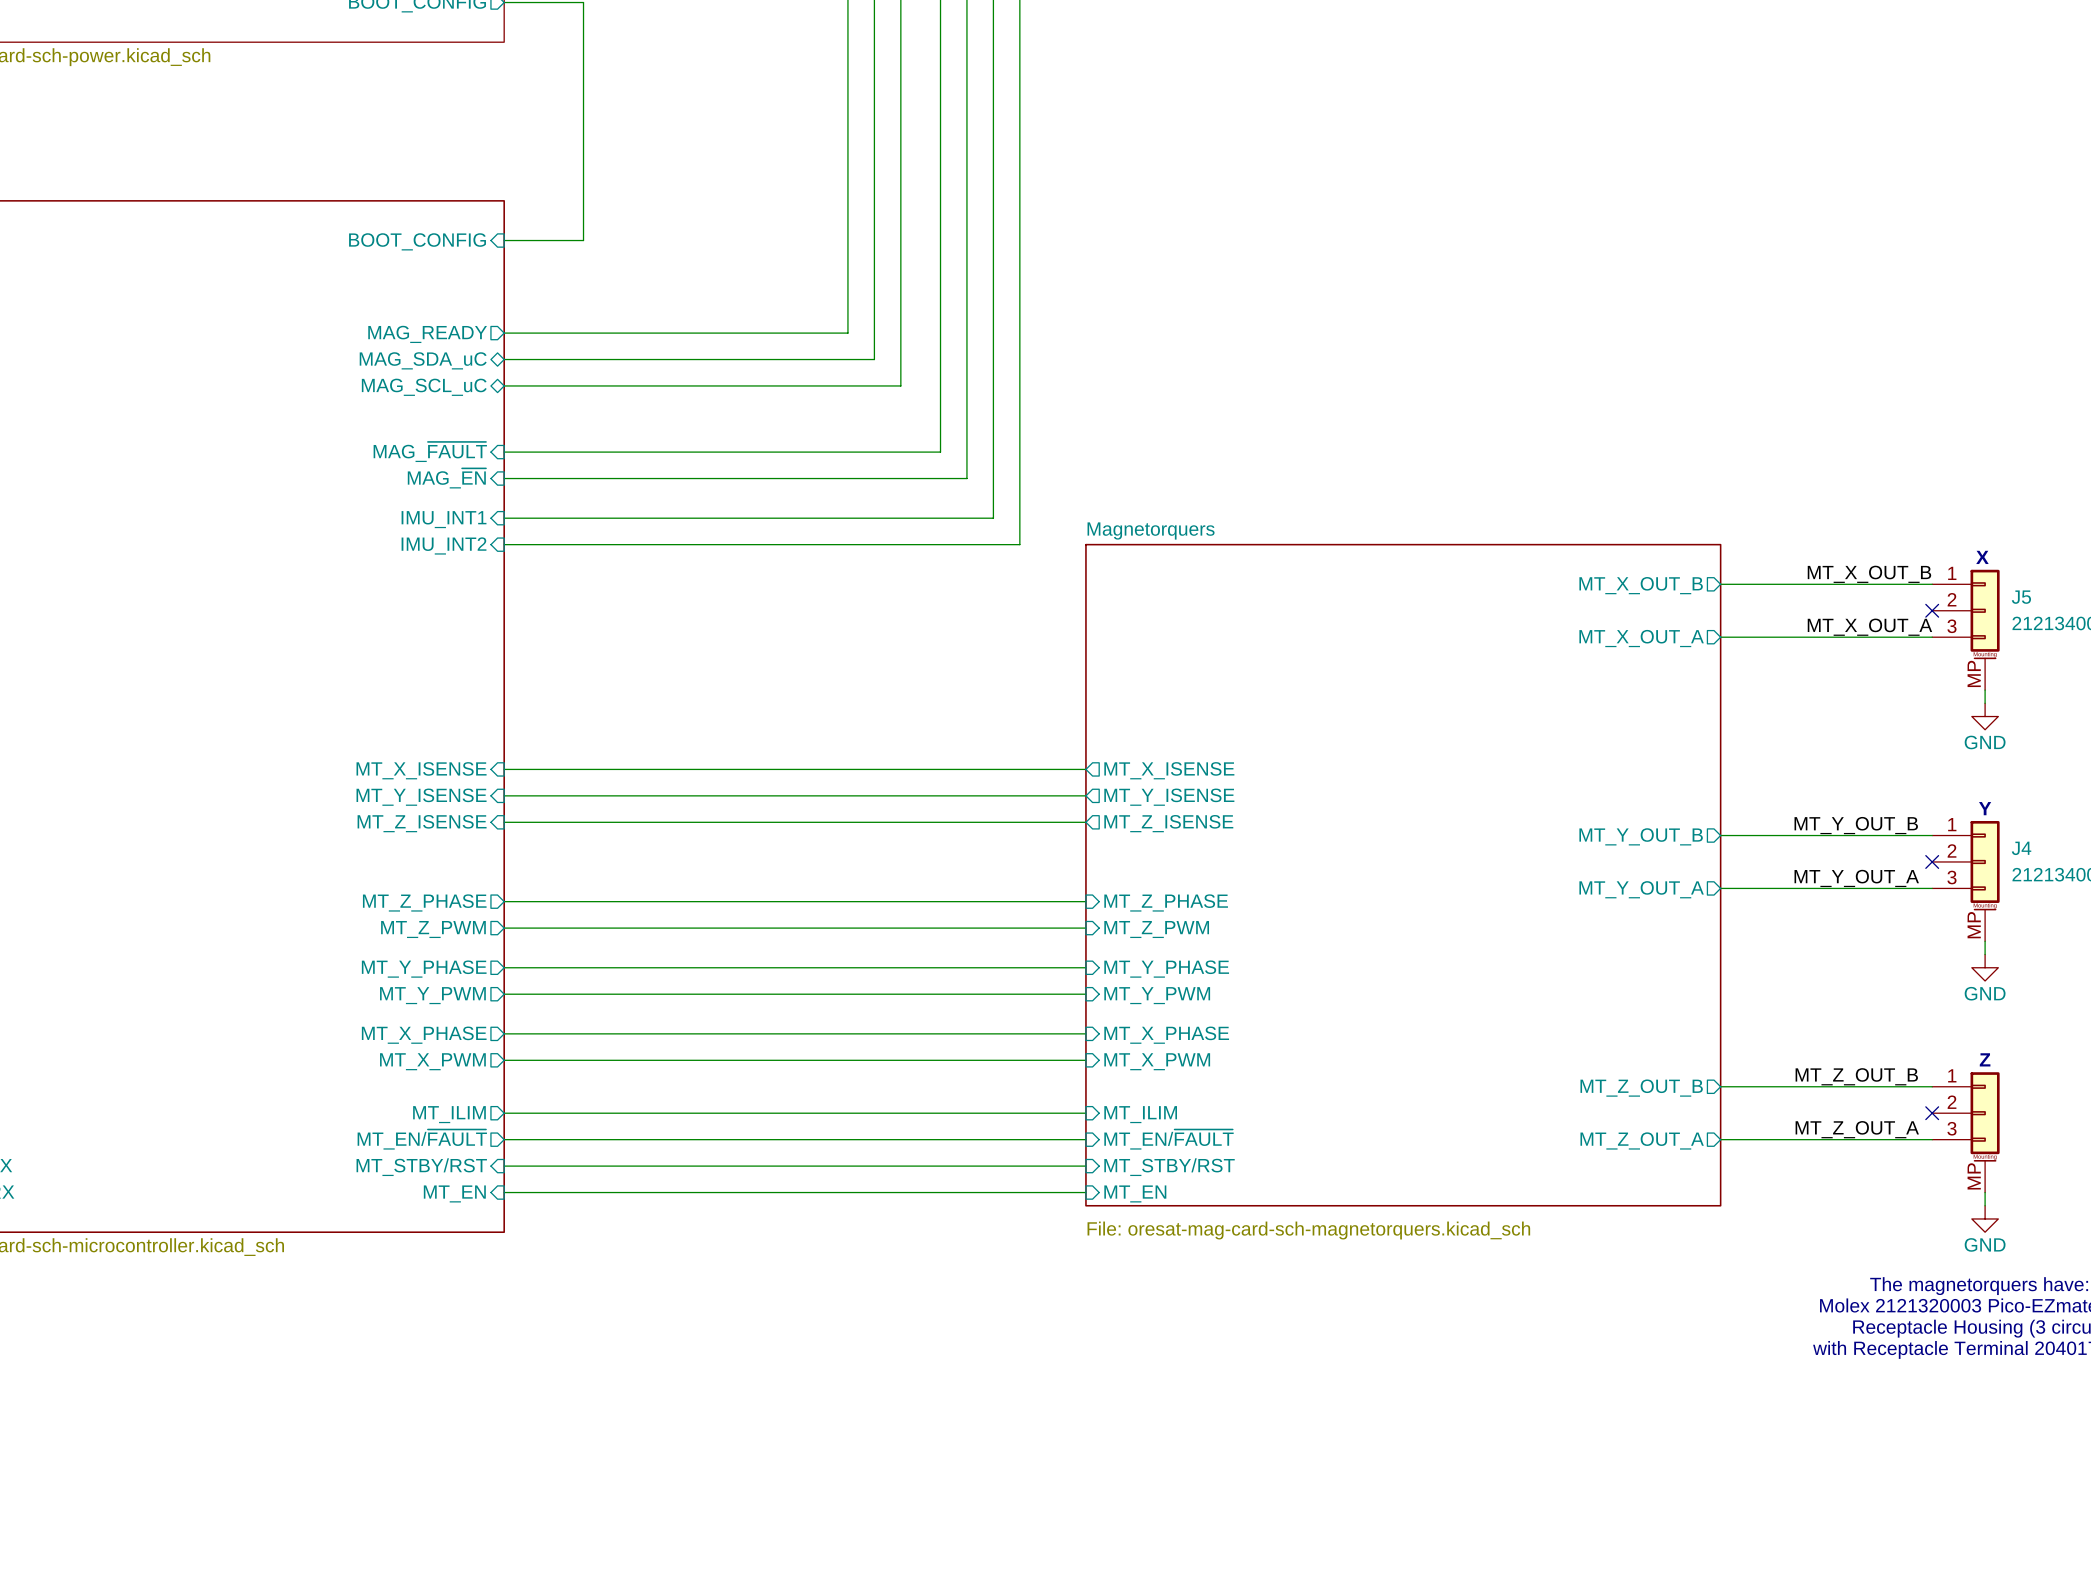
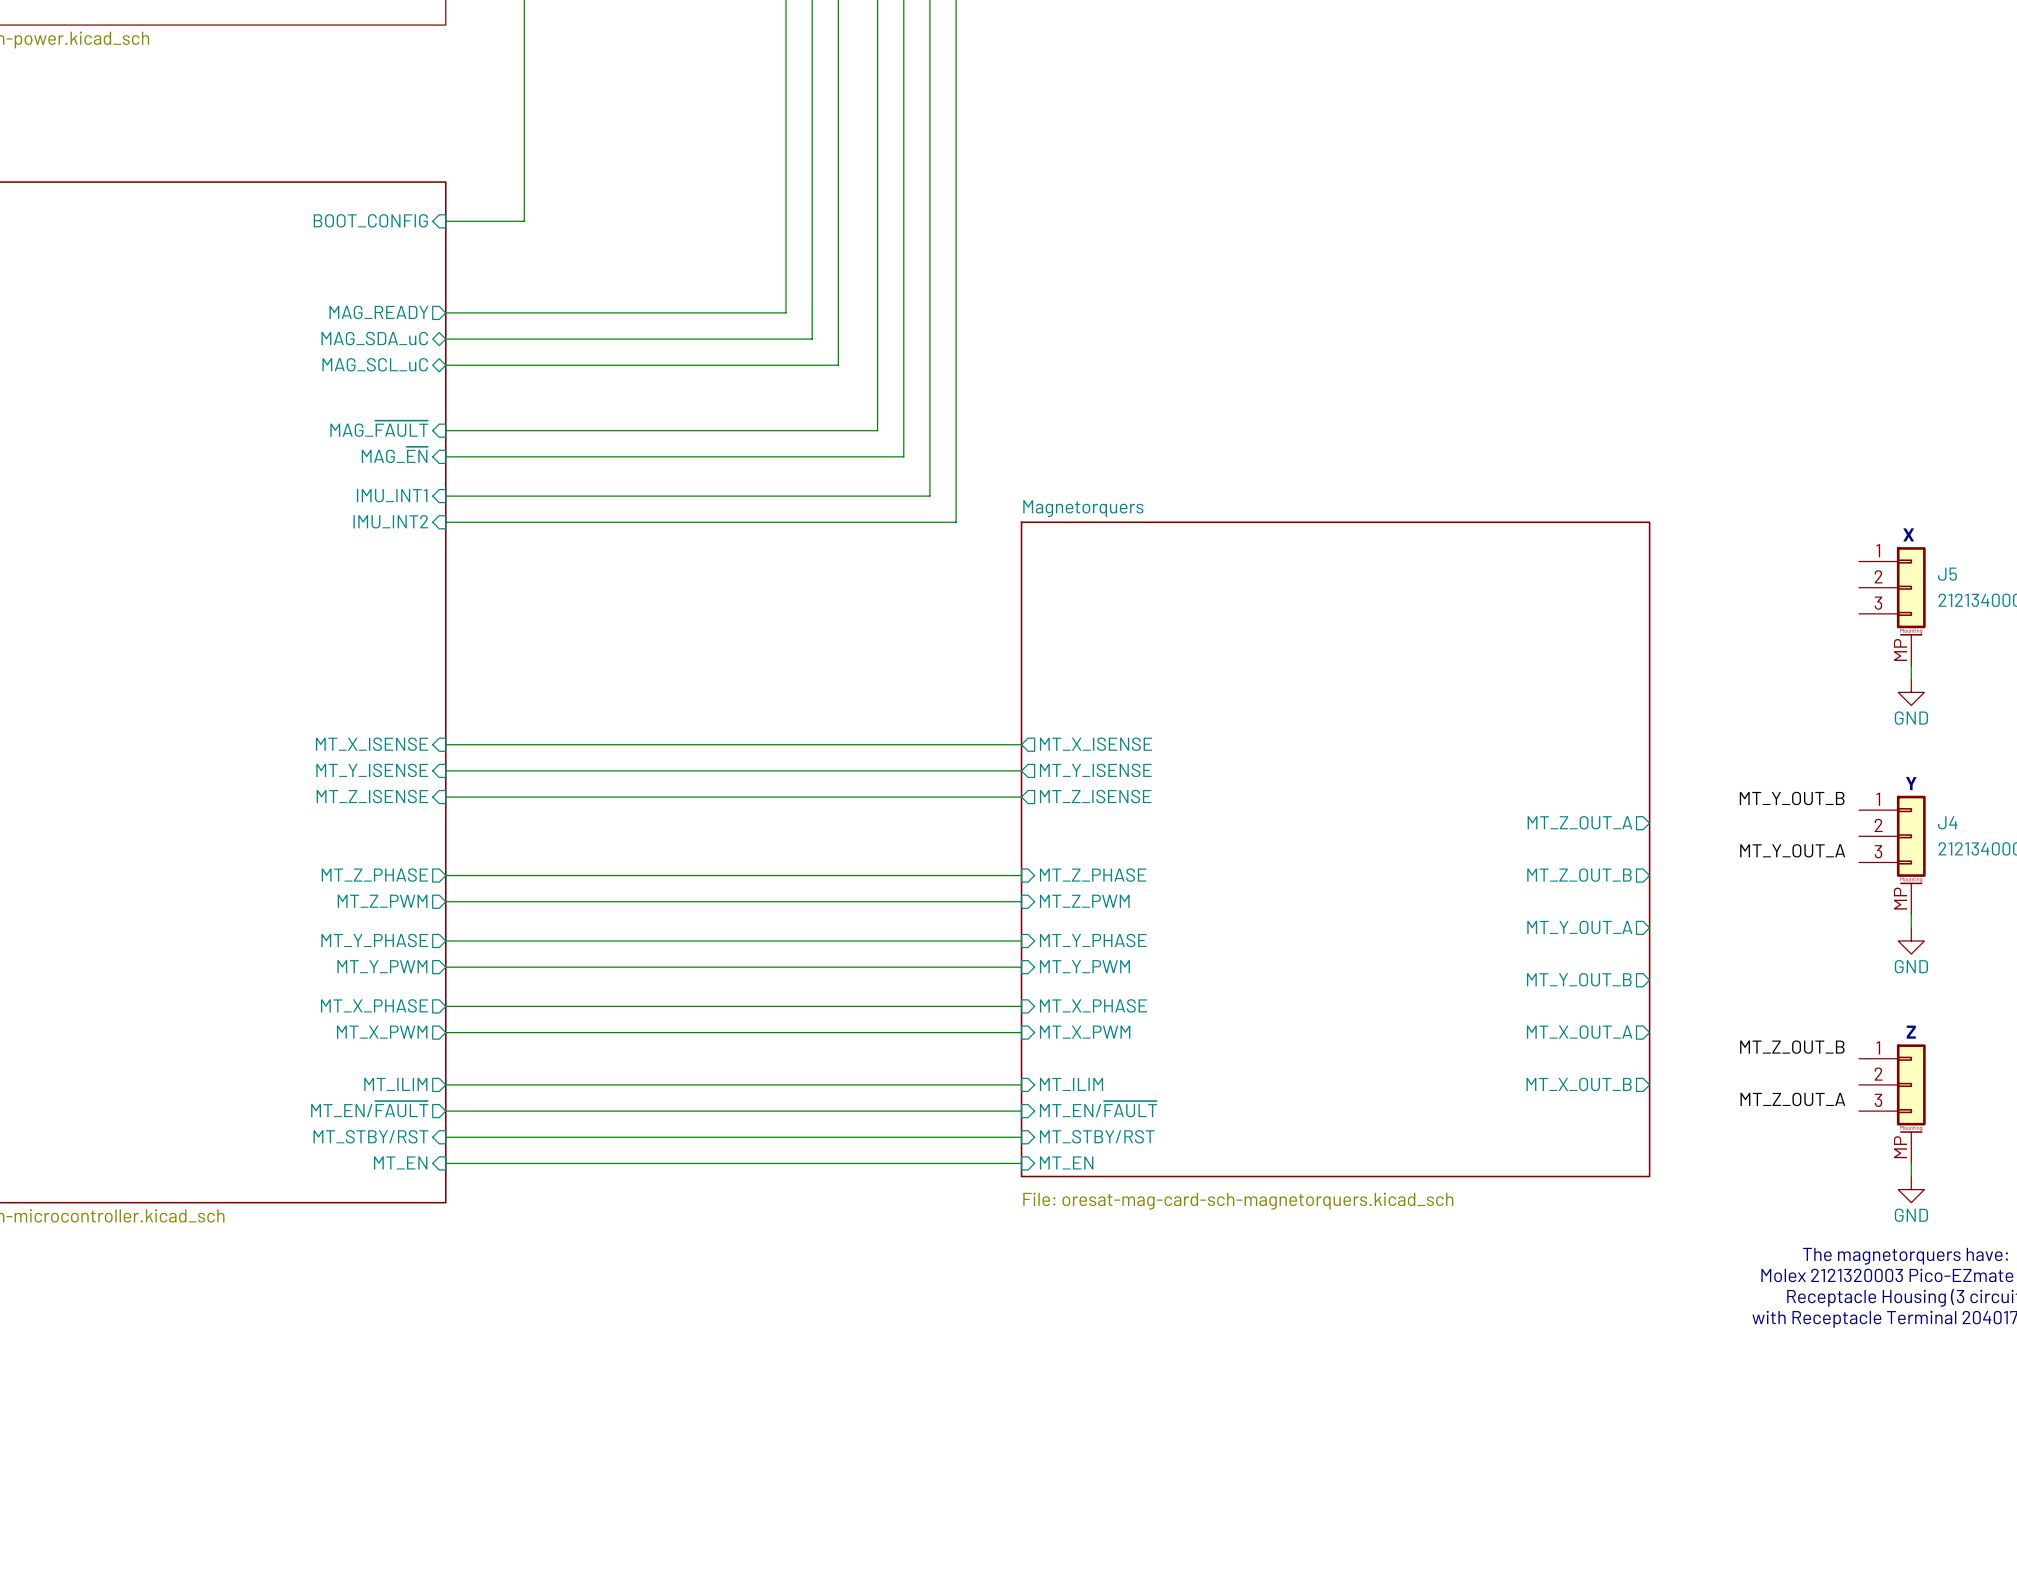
label: MT_X_OUT_B (1869, 574) -> none
wire: (1720, 584) (1932, 584) -> none
sheet pin: MT_X_OUT_B (1641, 585) -> none
no-connect mark: (1932, 610) -> none
label: MT_X_OUT_A (1869, 627) -> none
wire: (1720, 637) (1932, 637) -> none
sheet pin: MT_X_OUT_A (1641, 638) -> none
wire: (1720, 835) (1932, 835) -> none
sheet pin position: MT_Y_OUT_B (1641, 836) -> MT_Y_OUT_B (1579, 979)
sheet pin: none -> MT_Z_OUT_A (1579, 822)
no-connect mark: (1932, 861) -> none
wire: (1720, 888) (1932, 888) -> none
sheet pin position: MT_Y_OUT_A (1641, 889) -> MT_Y_OUT_A (1579, 927)
sheet pin: none -> MT_X_OUT_A (1579, 1032)
wire: (1720, 1086) (1932, 1086) -> none
sheet pin position: MT_Z_OUT_B (1641, 1088) -> MT_Z_OUT_B (1579, 875)
no-connect mark: (1932, 1113) -> none
wire: (1720, 1139) (1932, 1139) -> none
sheet pin: MT_Z_OUT_A (1642, 1140) -> MT_X_OUT_B (1579, 1084)

